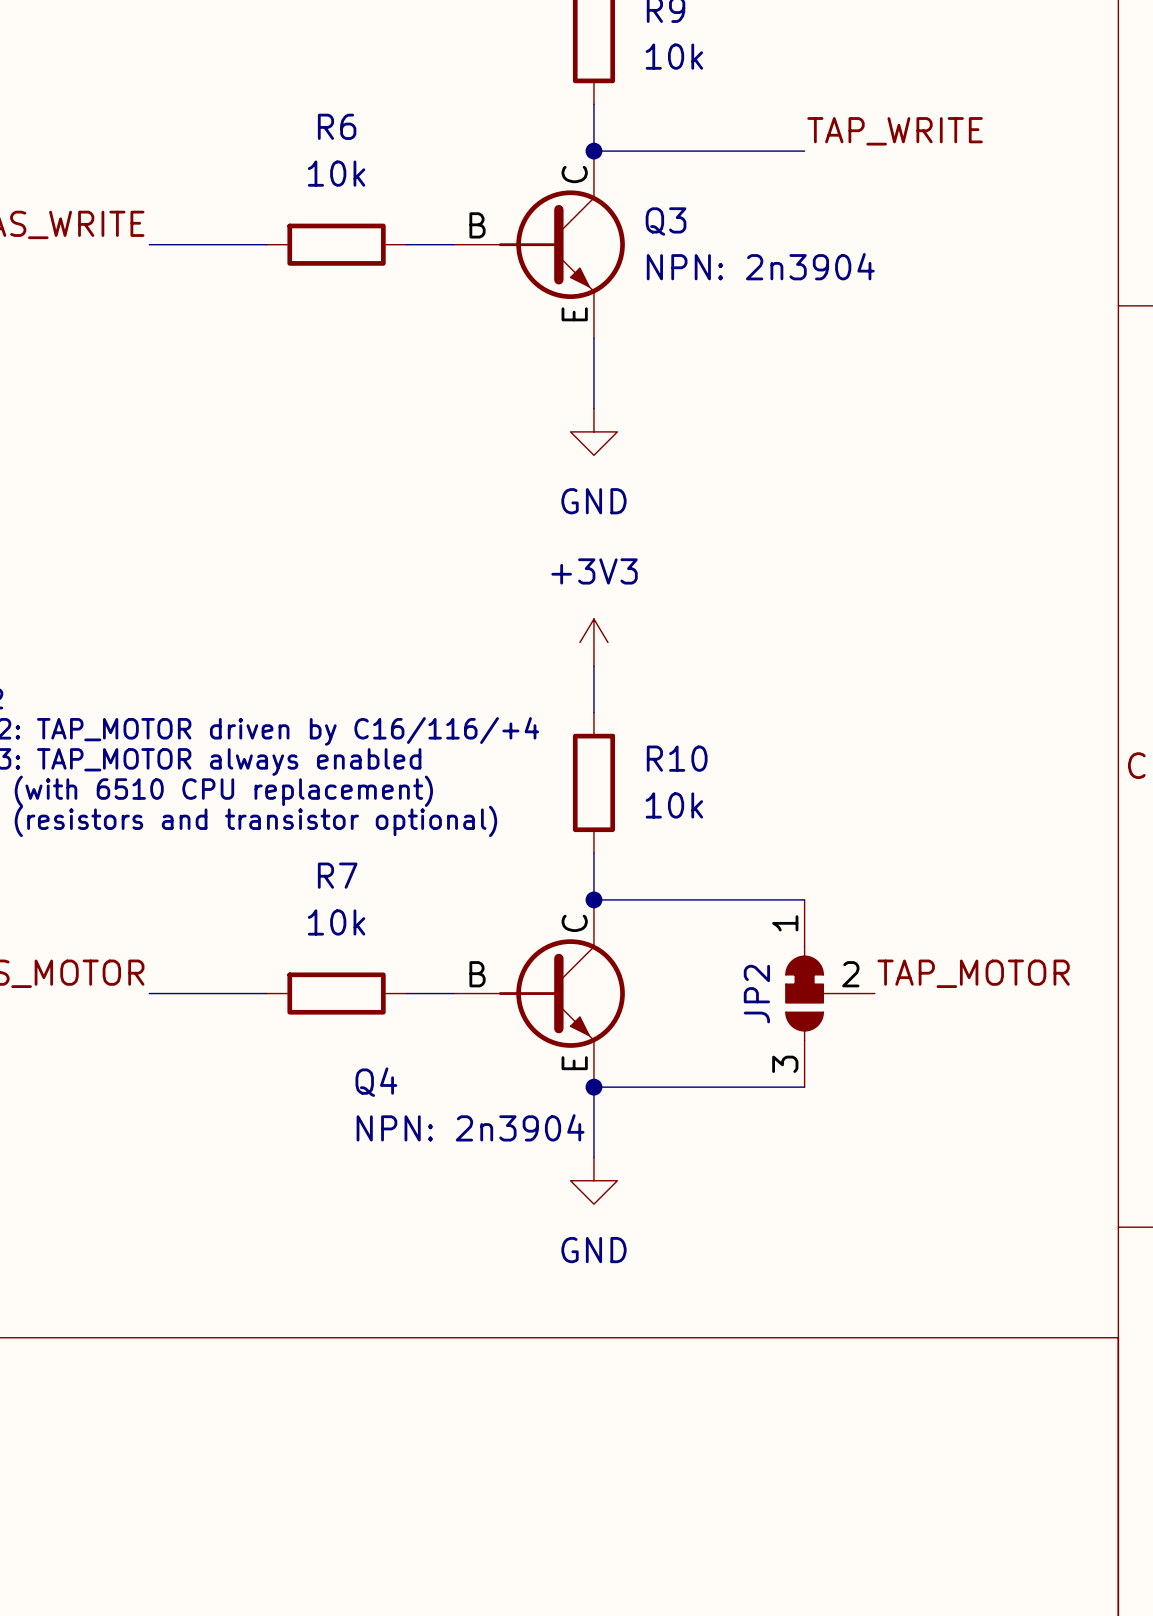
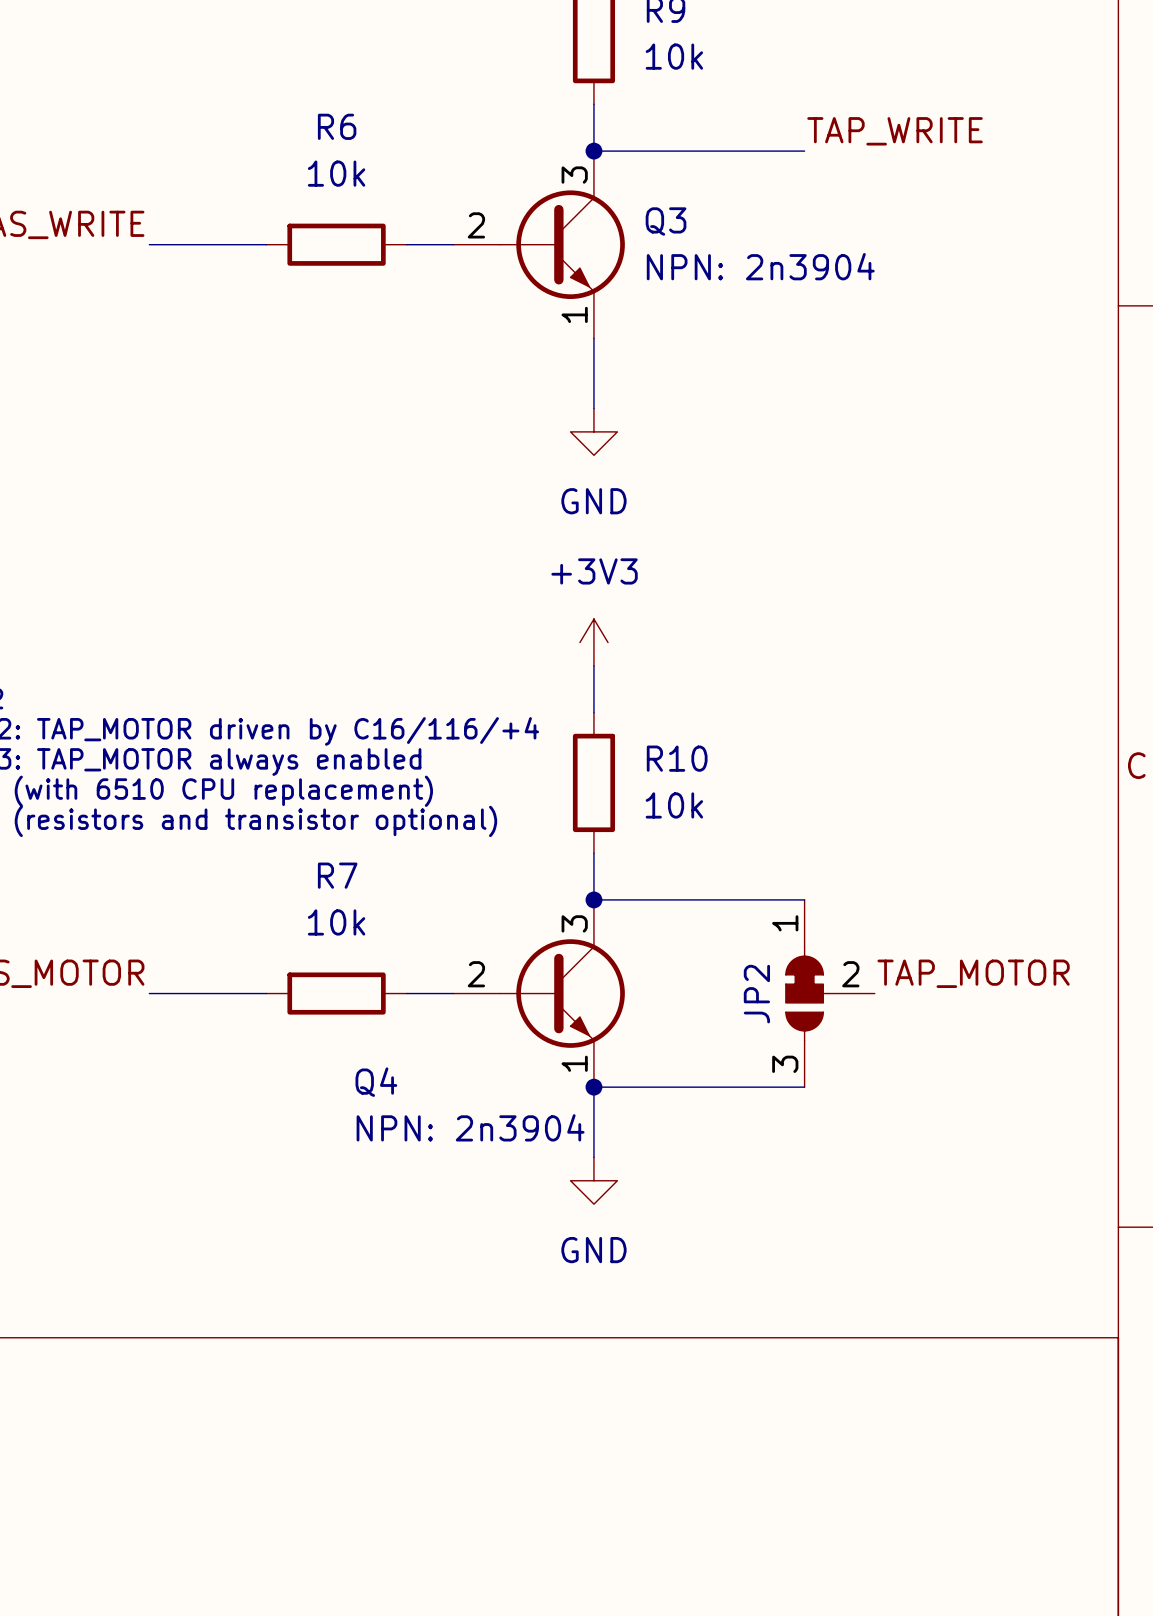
Q3 symbol: [453, 151, 625, 339] -> [453, 151, 625, 339]
Q4 symbol: [453, 899, 625, 1088] -> [453, 899, 625, 1088]

